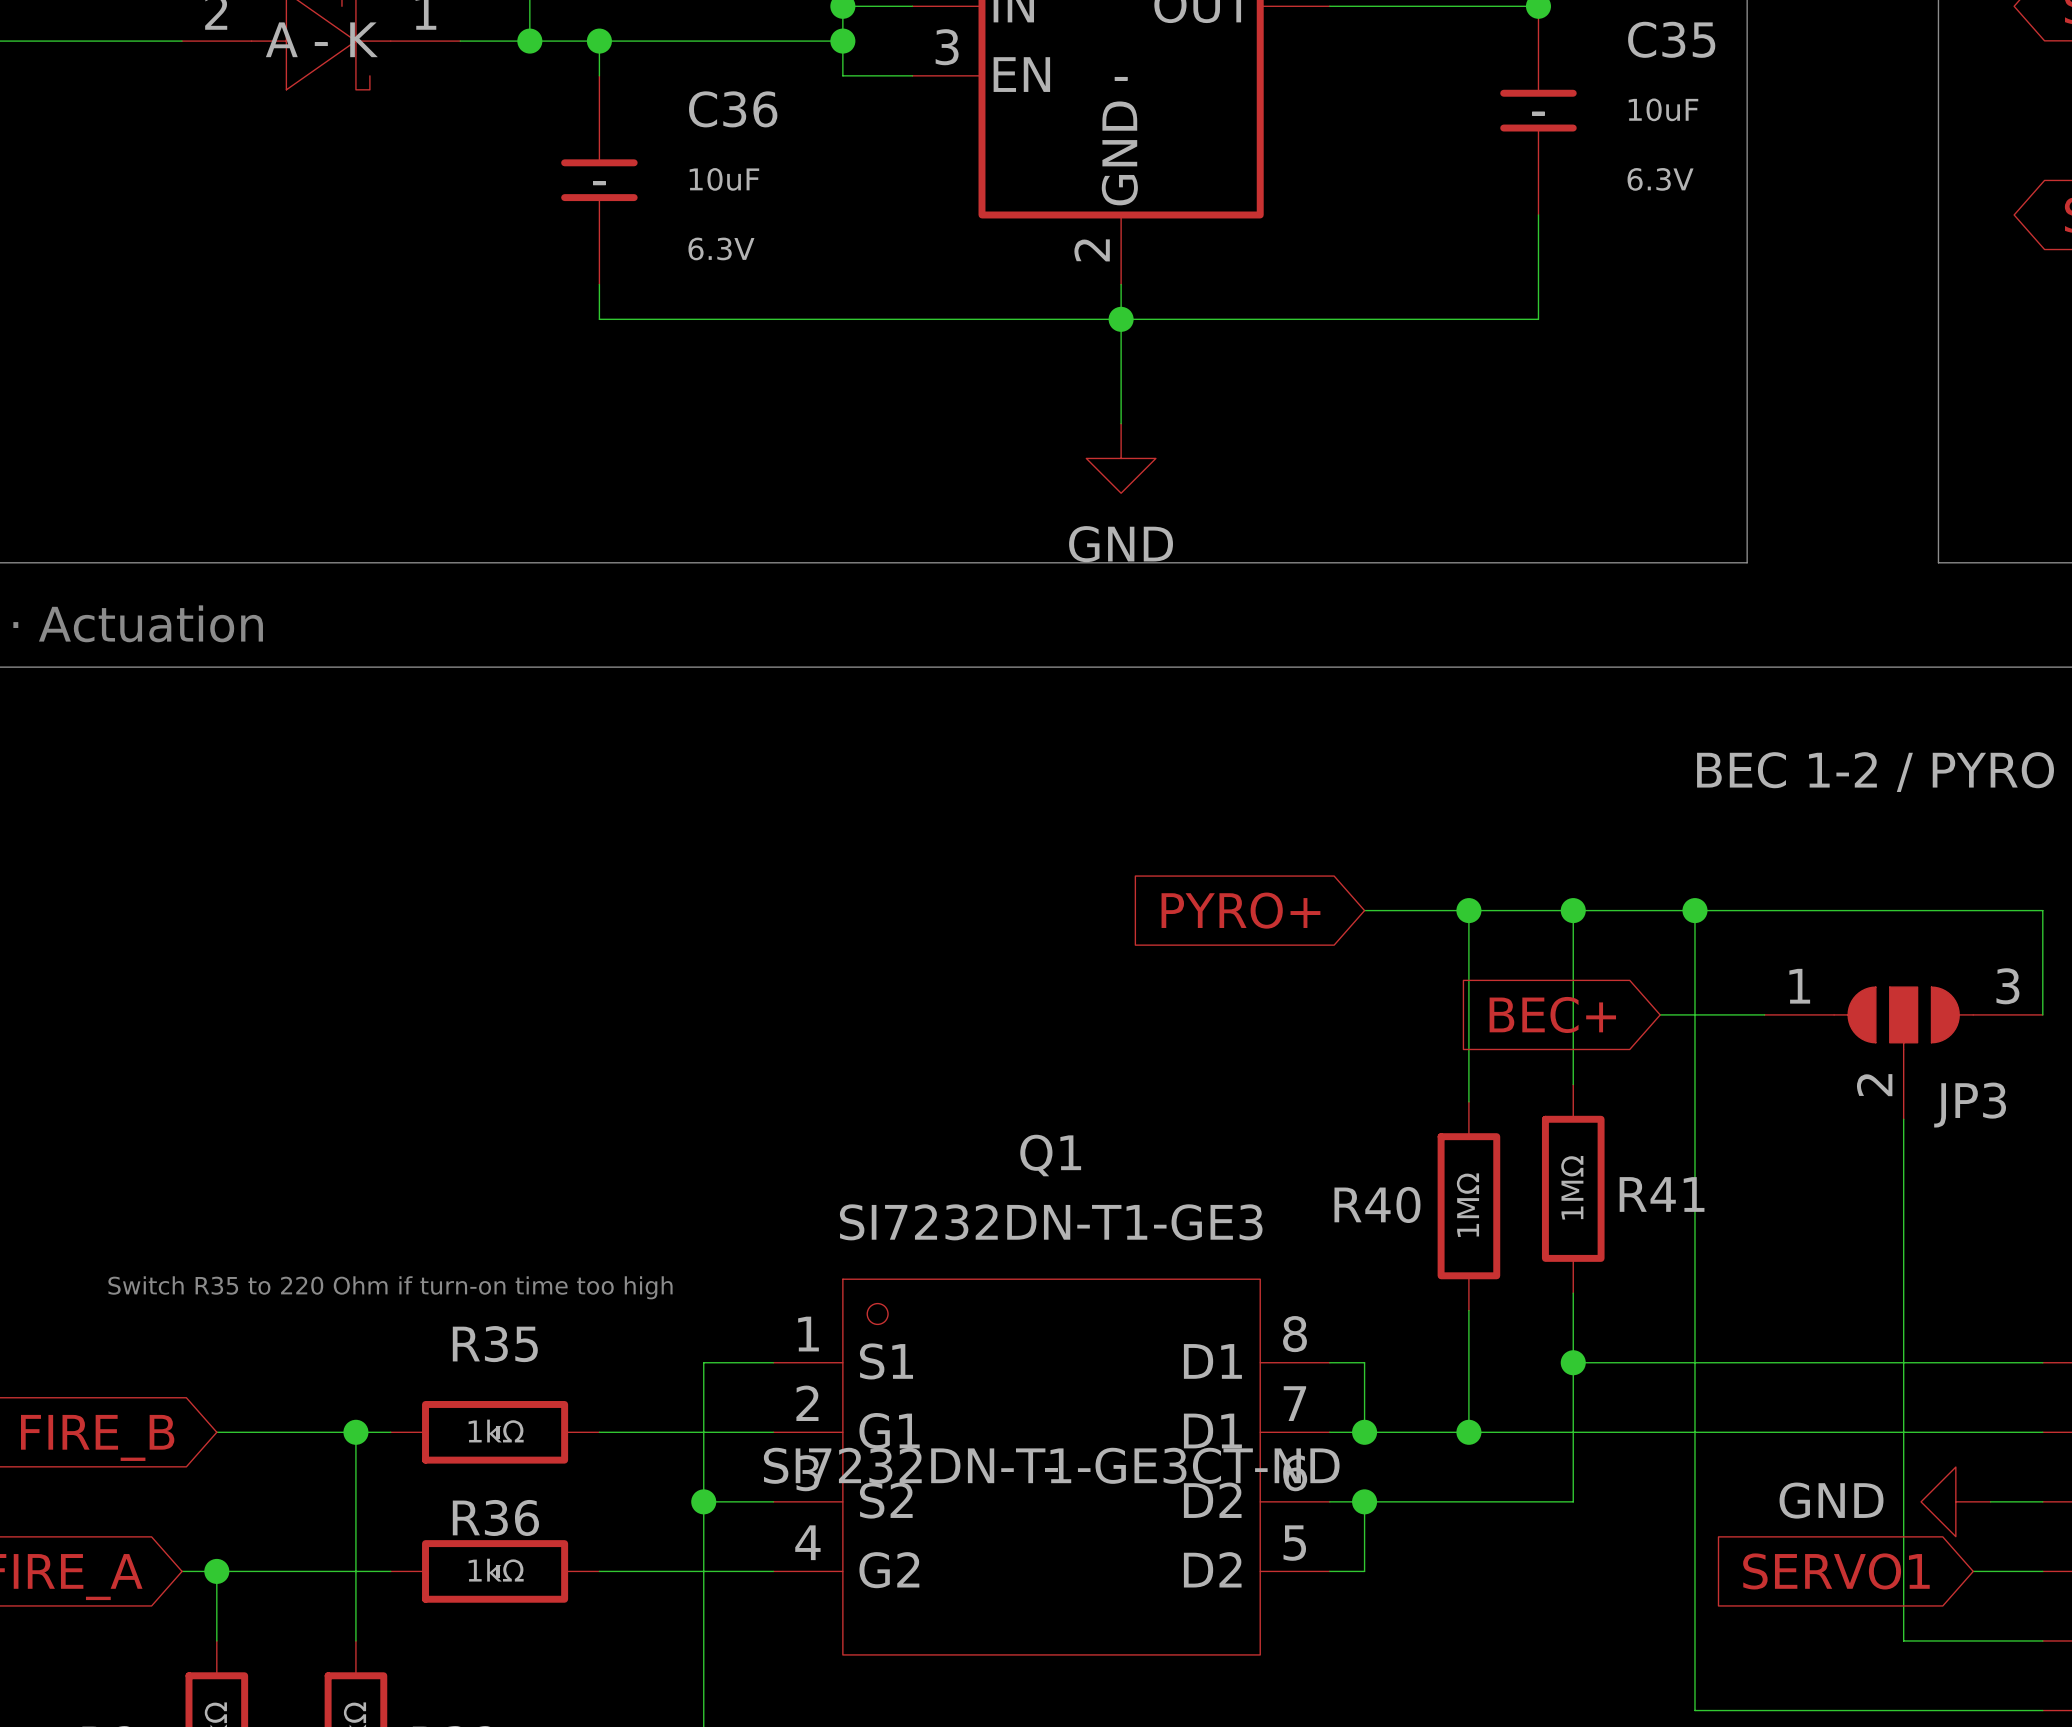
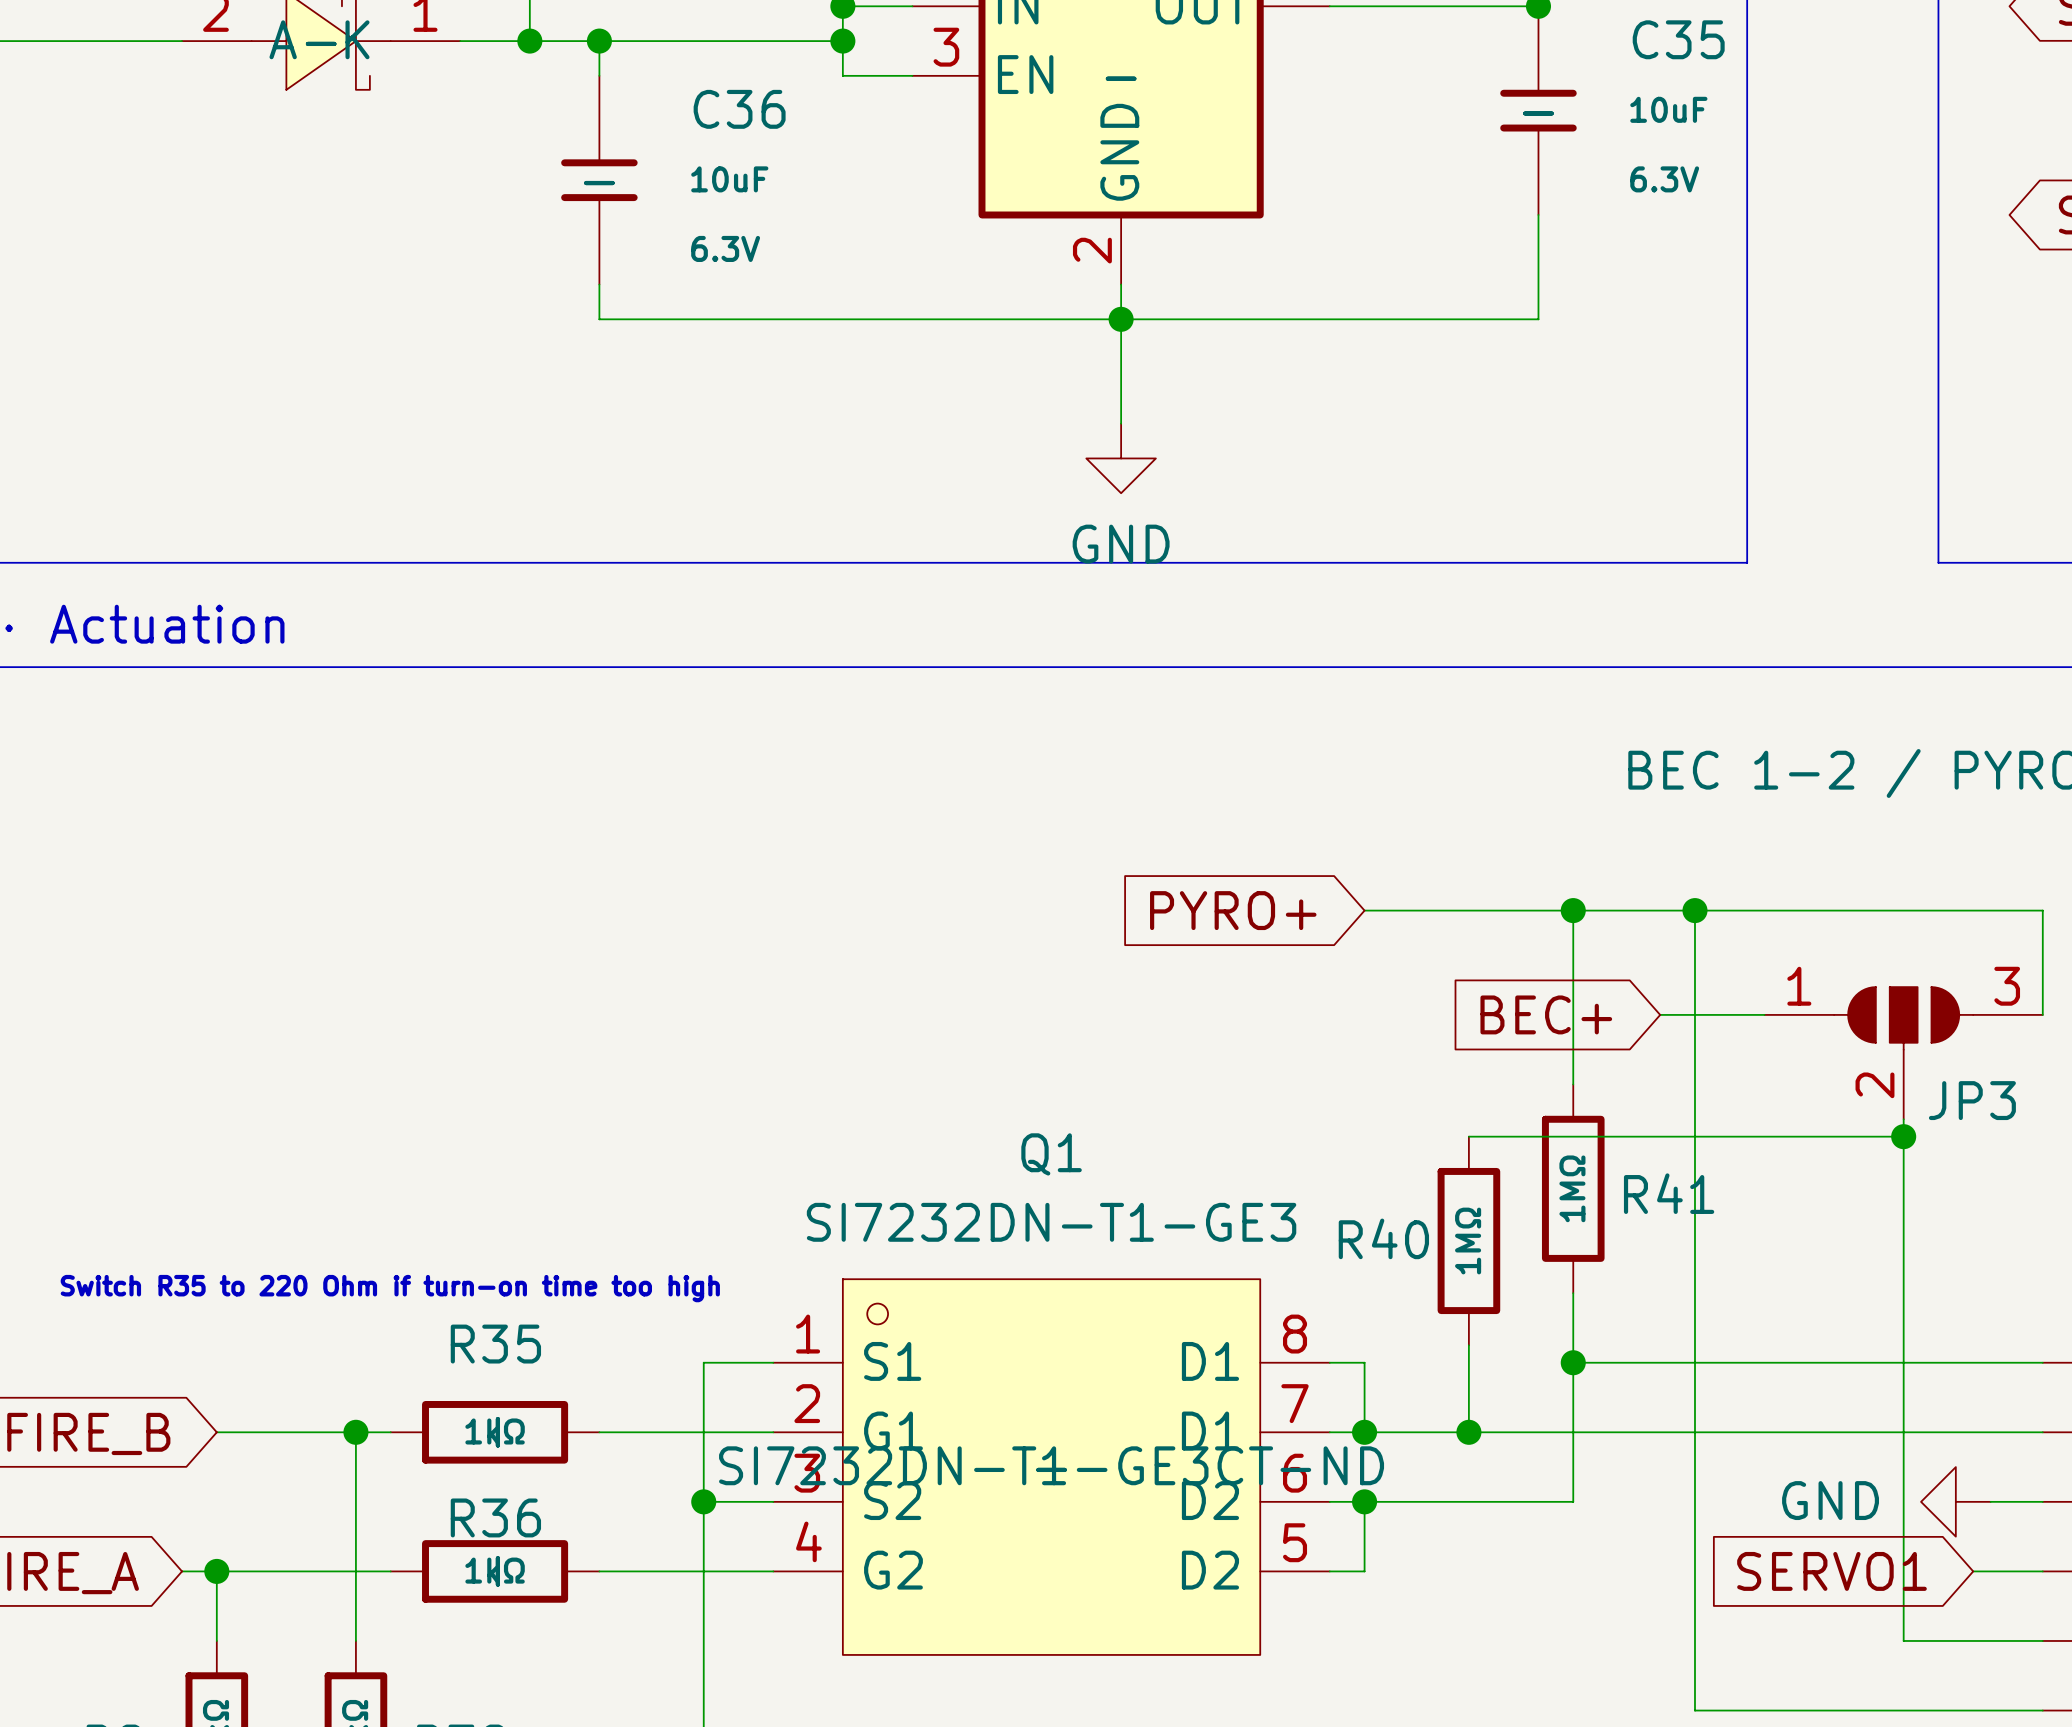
wire: (1468, 910) (1468, 1101) -> none
junction: (1468, 910) -> none
wire: none -> (1468, 1136) (1903, 1136)
junction: none -> (1903, 1136)
R40 position: (1468, 1206) -> (1468, 1241)

